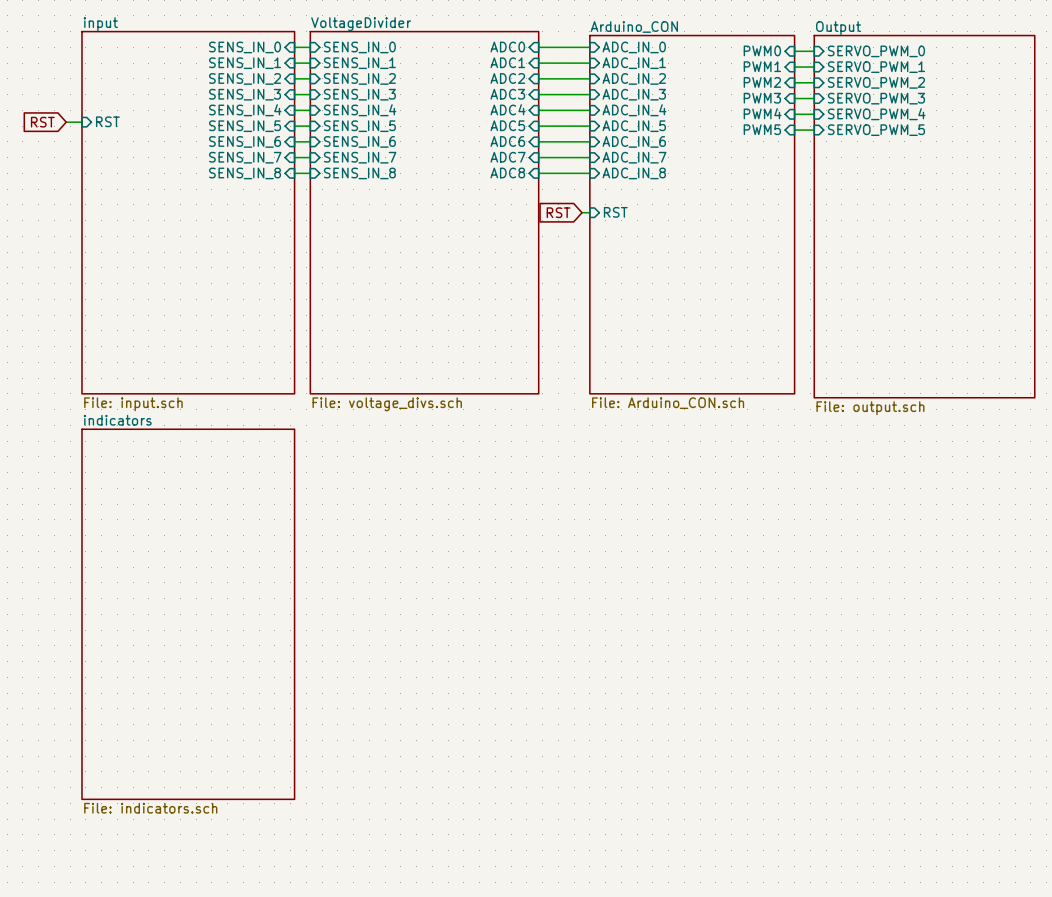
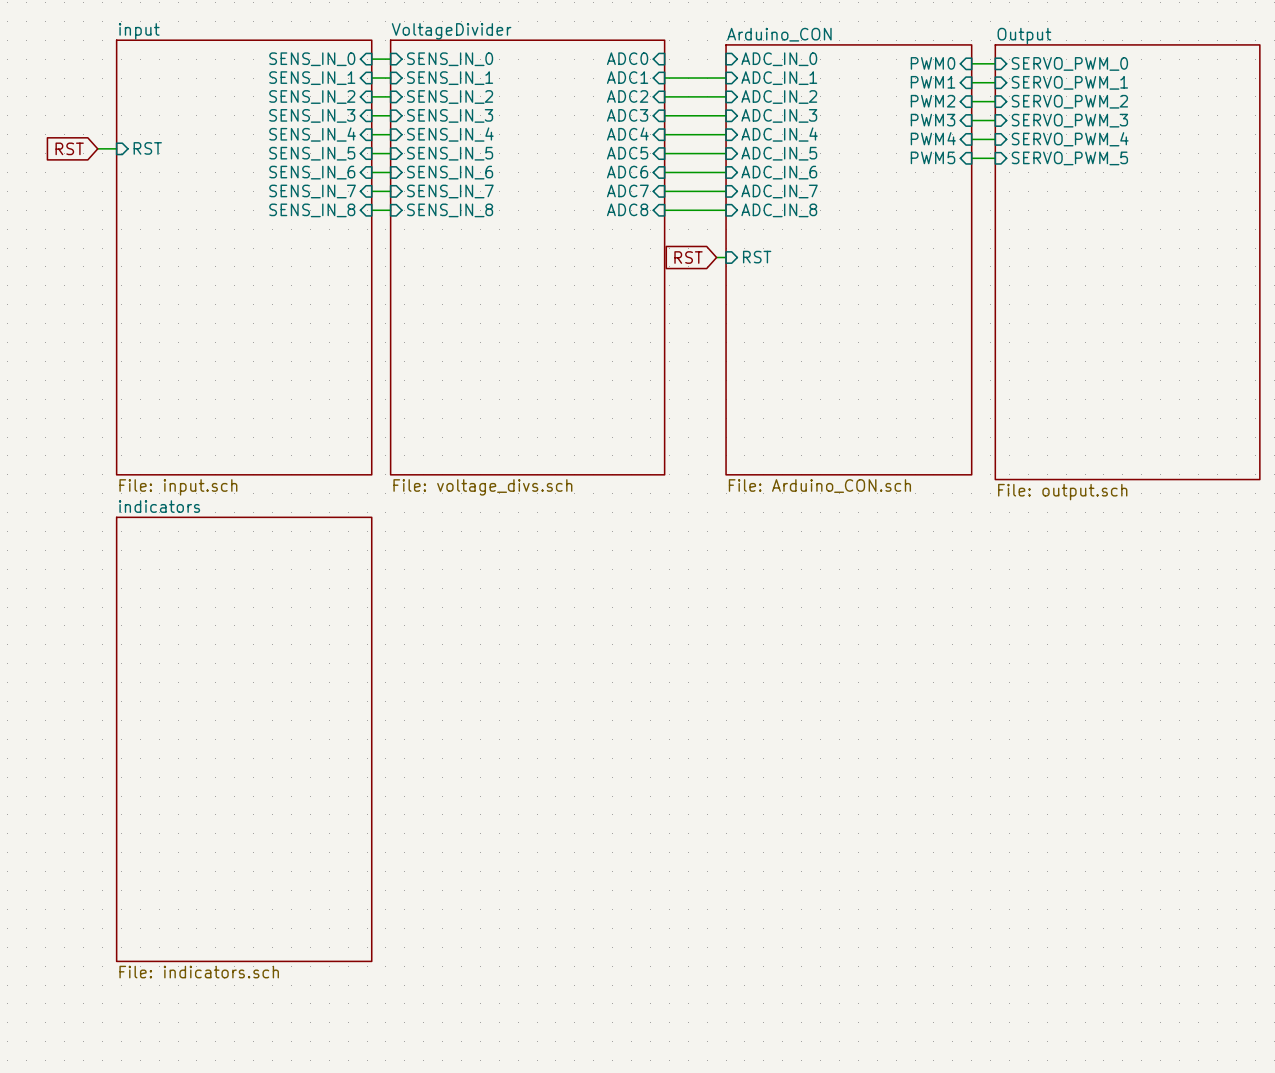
wire: (538, 47) (589, 47) -> none

